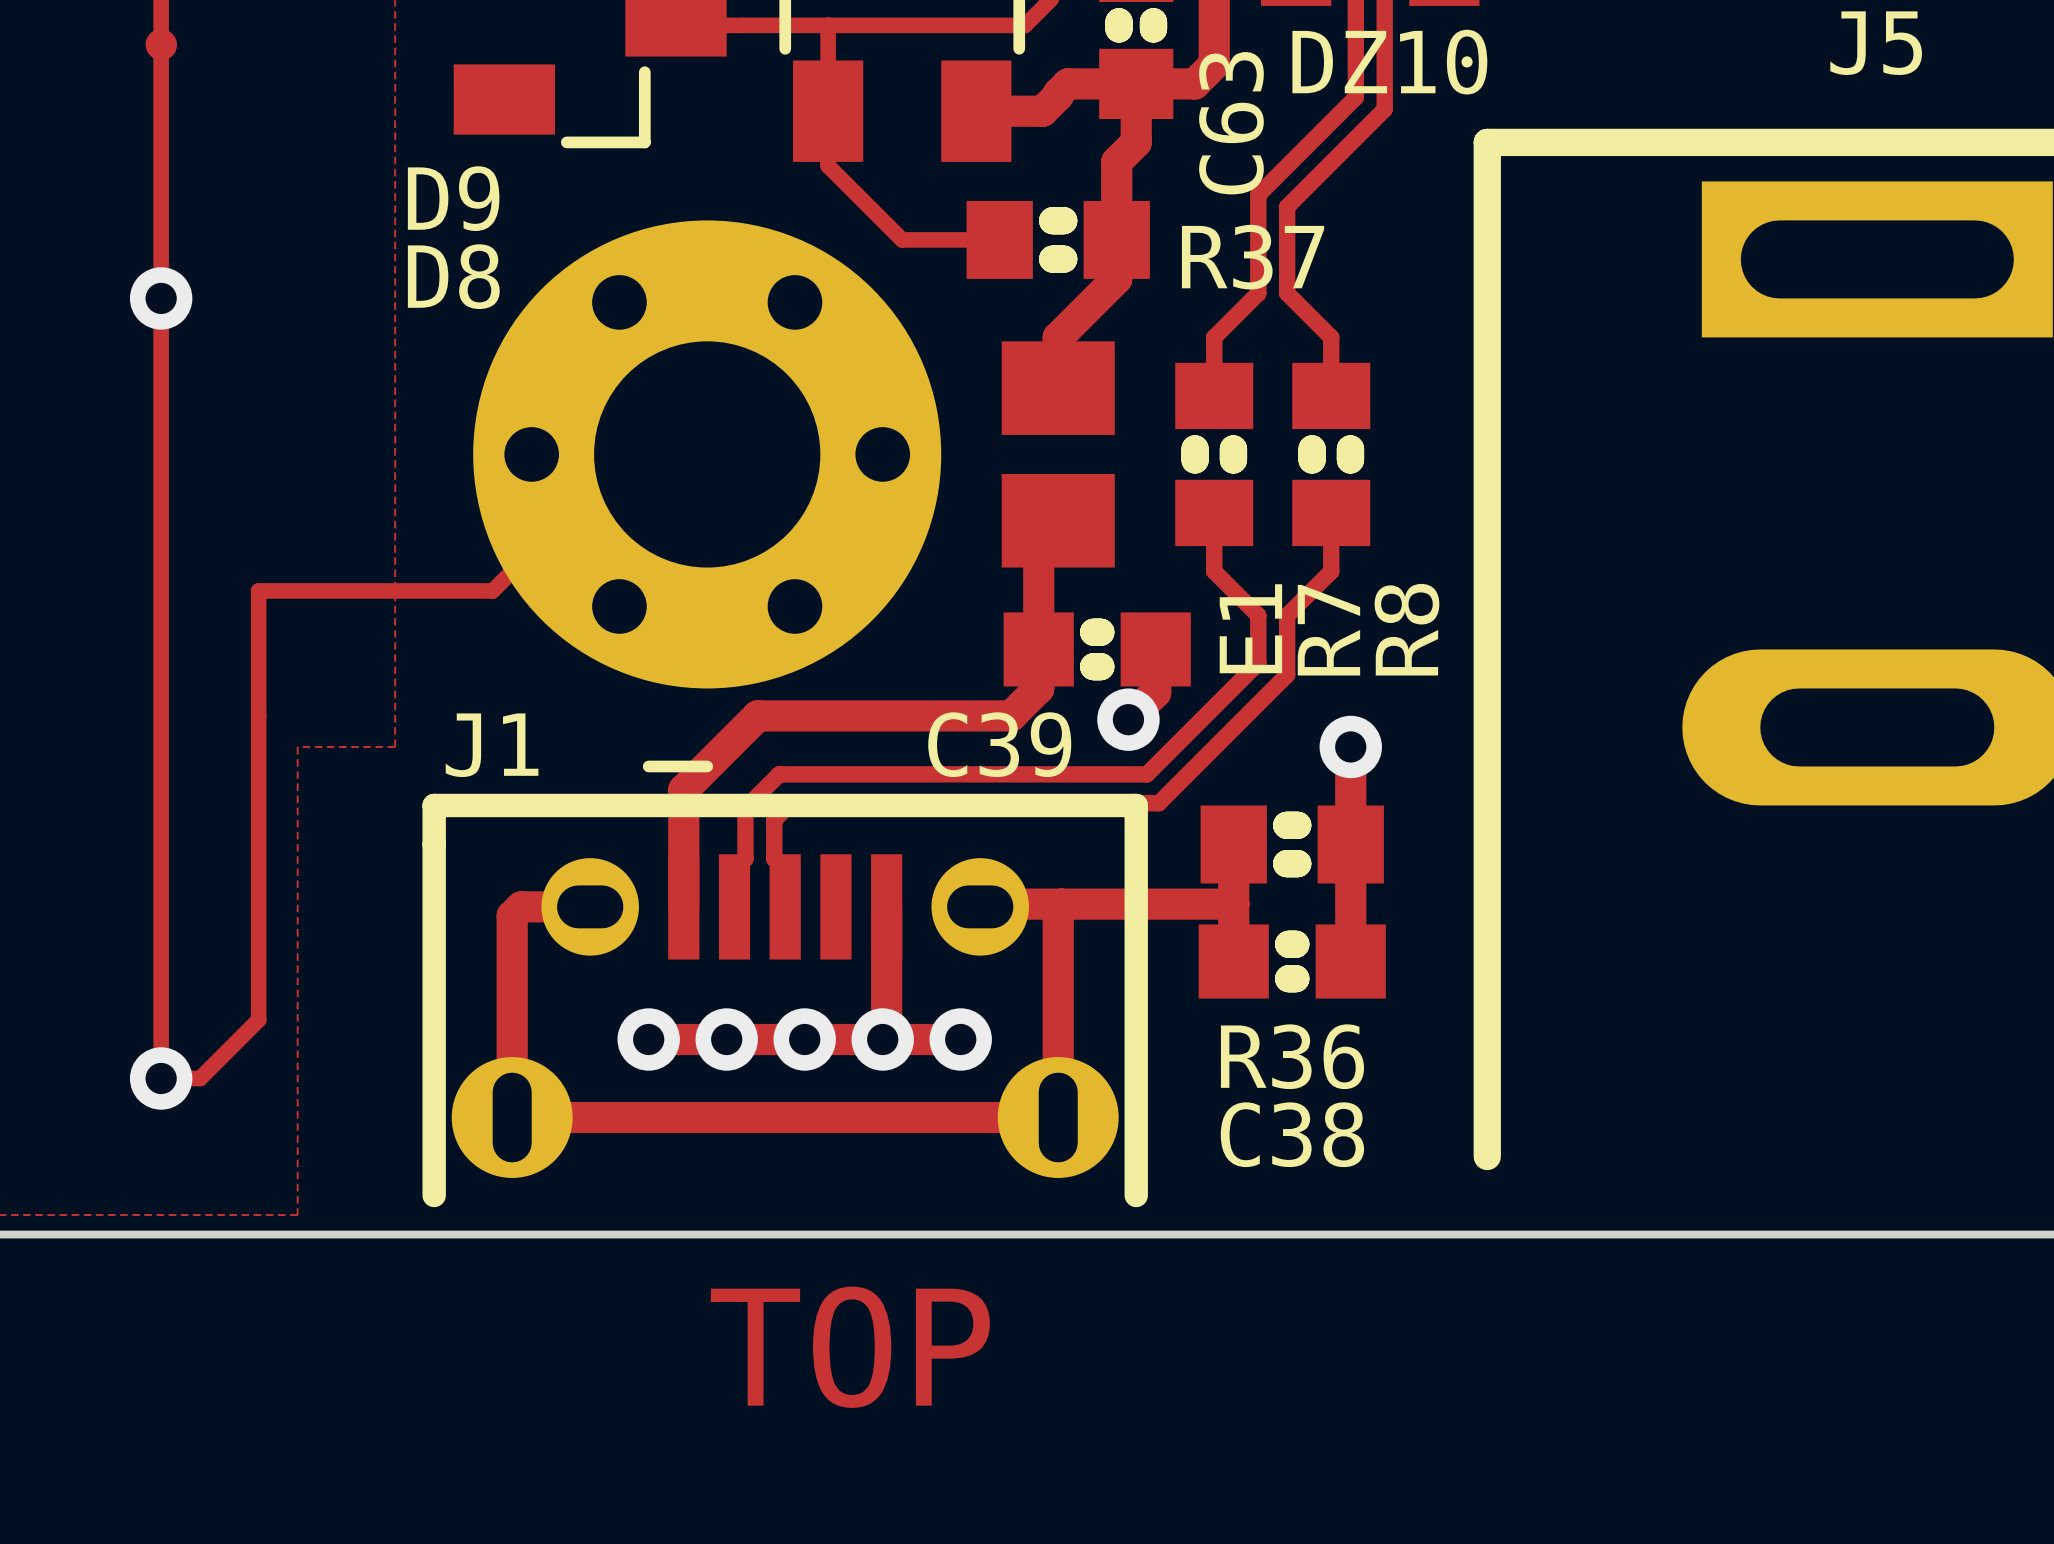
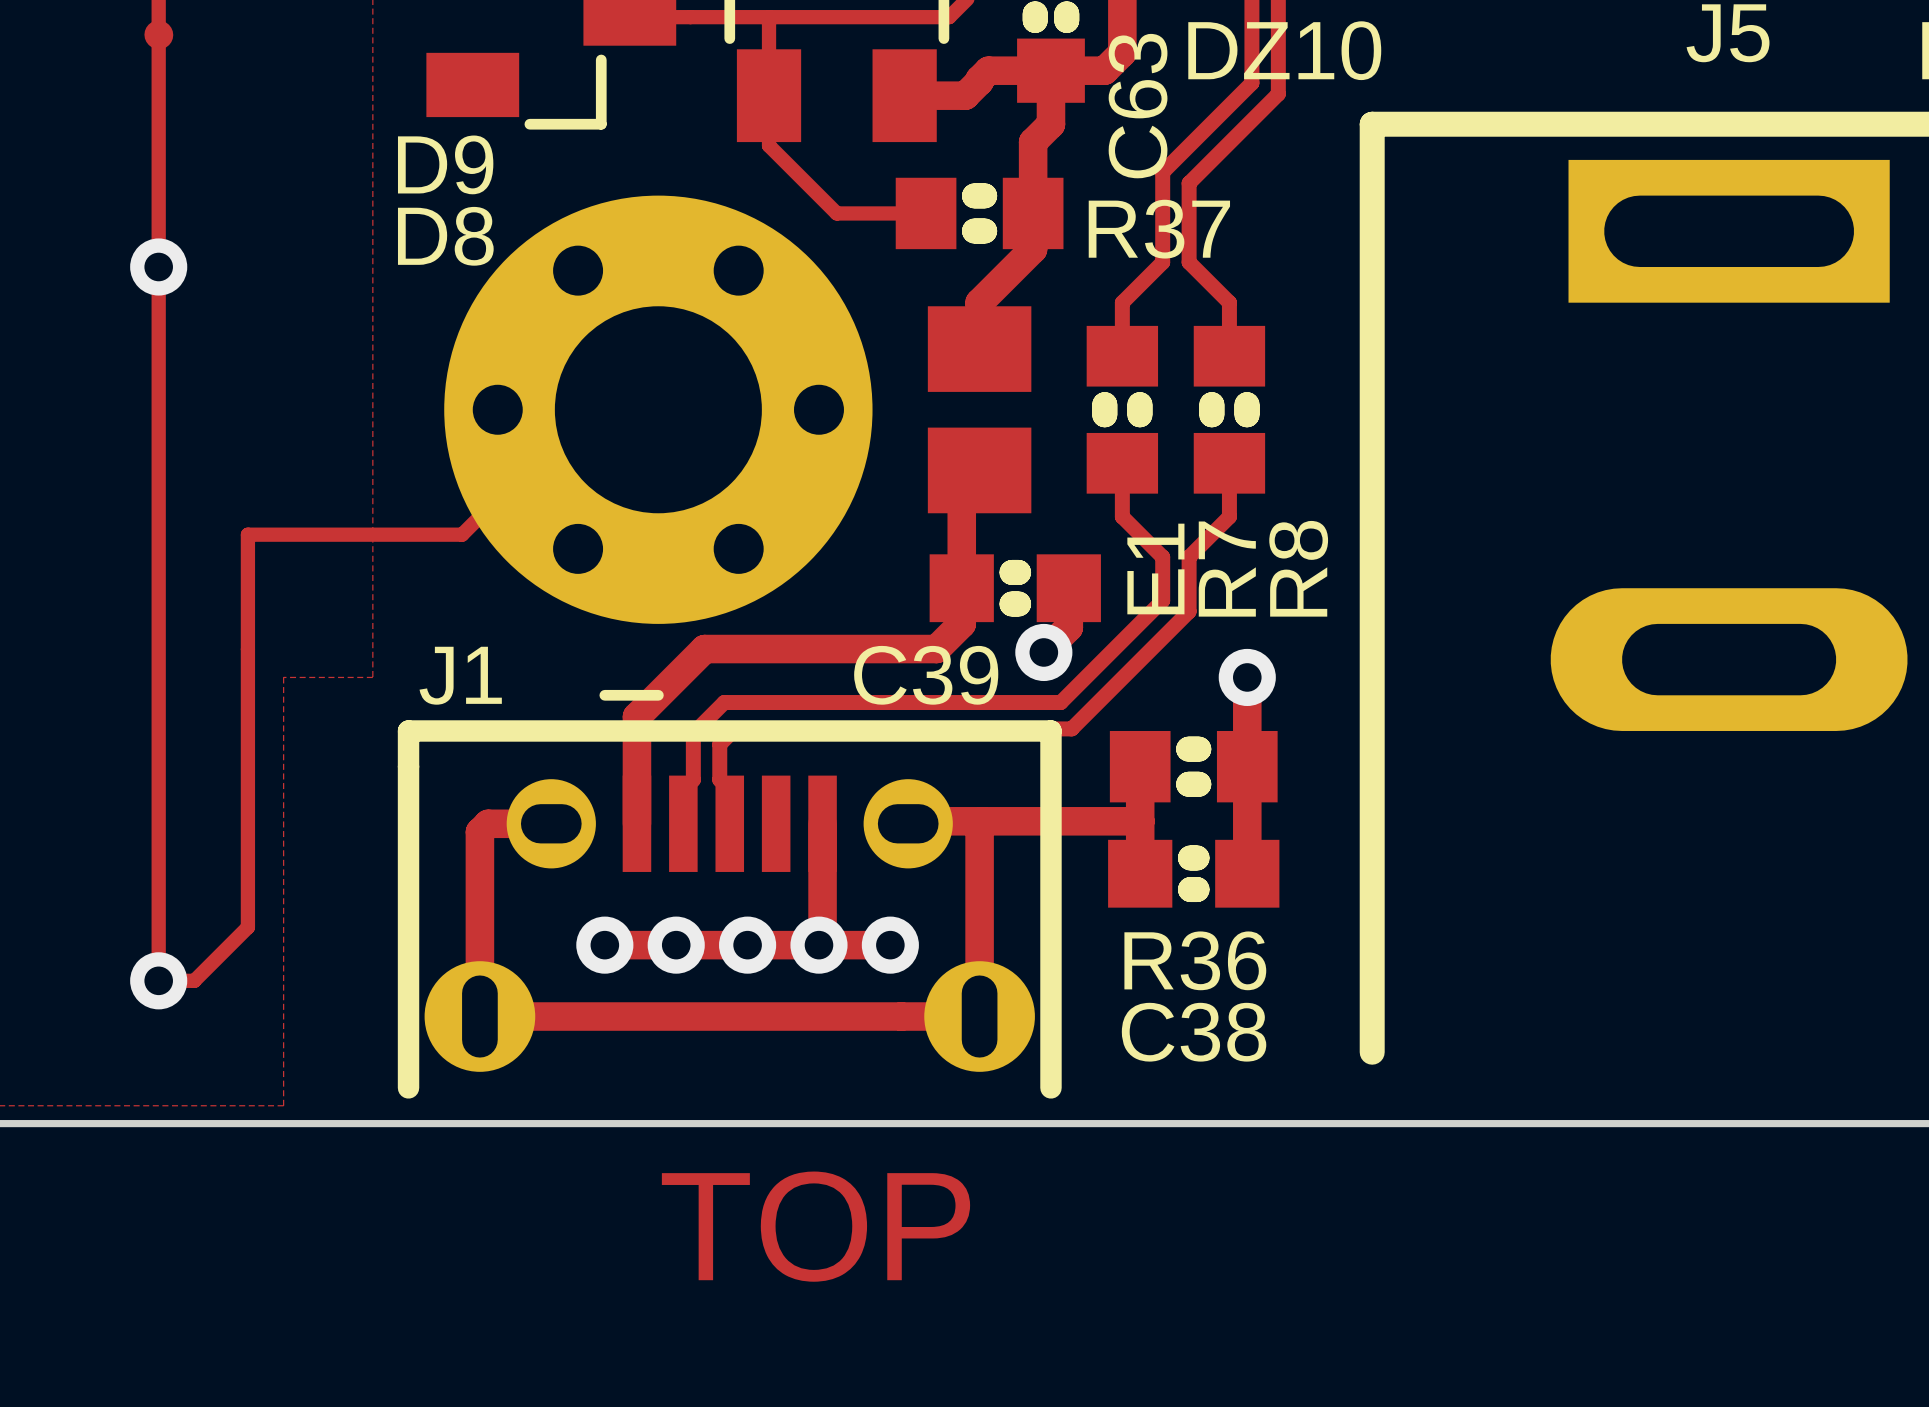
D9 name position: D9 (453, 198) -> D9 (445, 164)
D8 name position: D8 (453, 276) -> D8 (445, 236)

